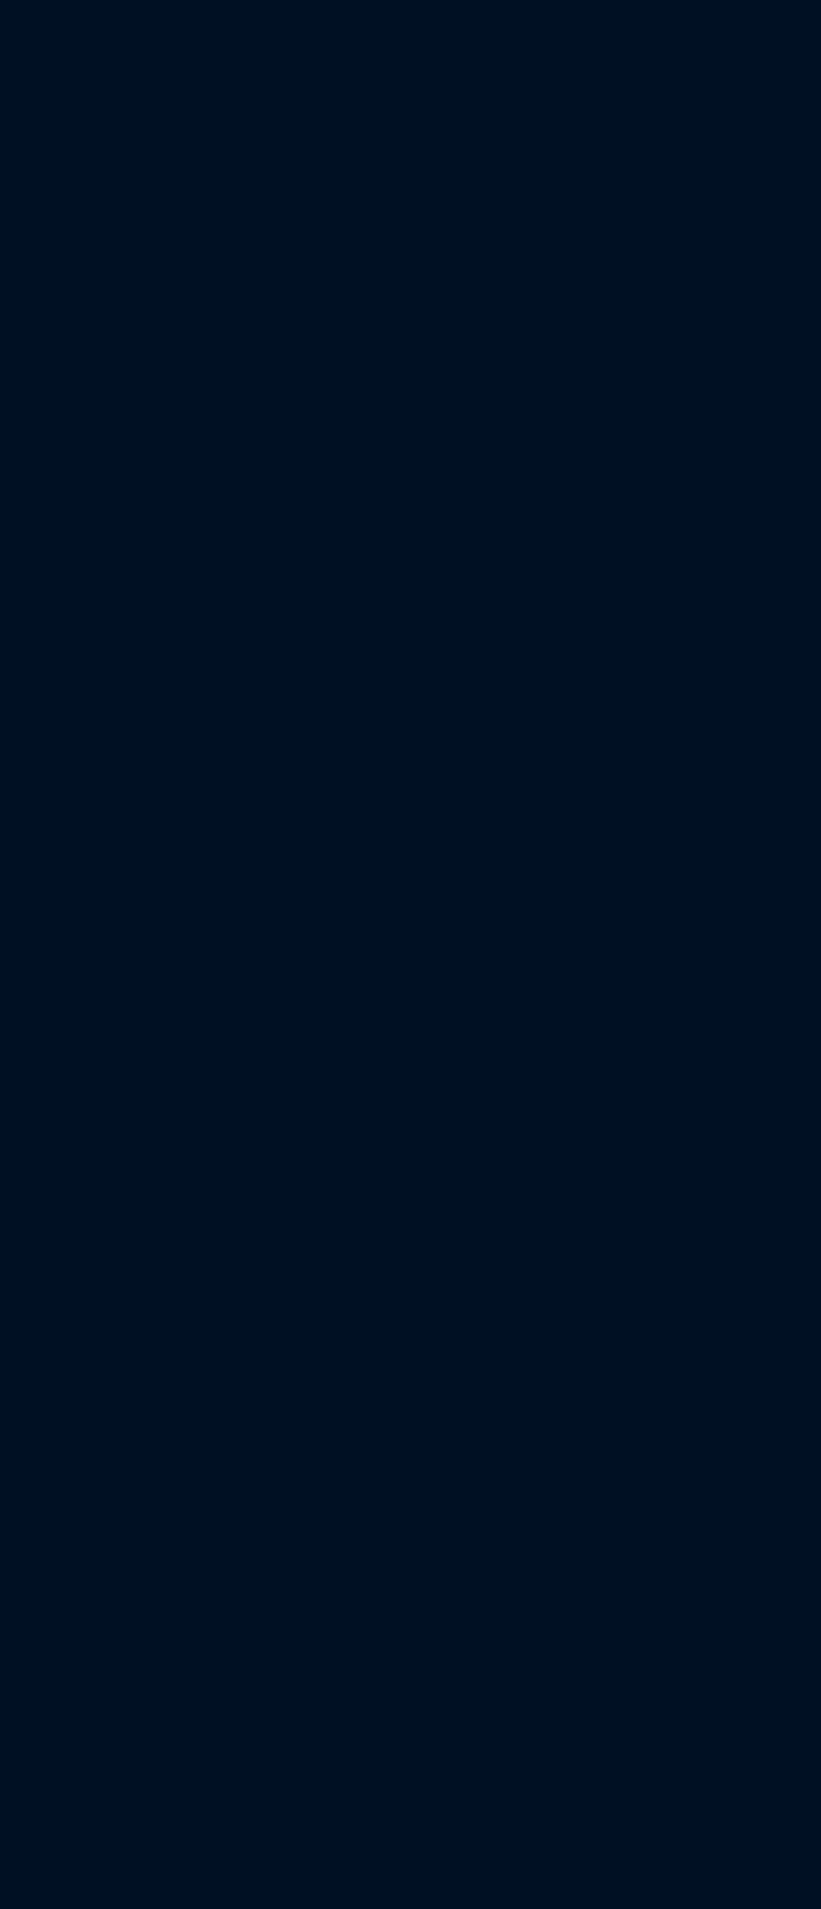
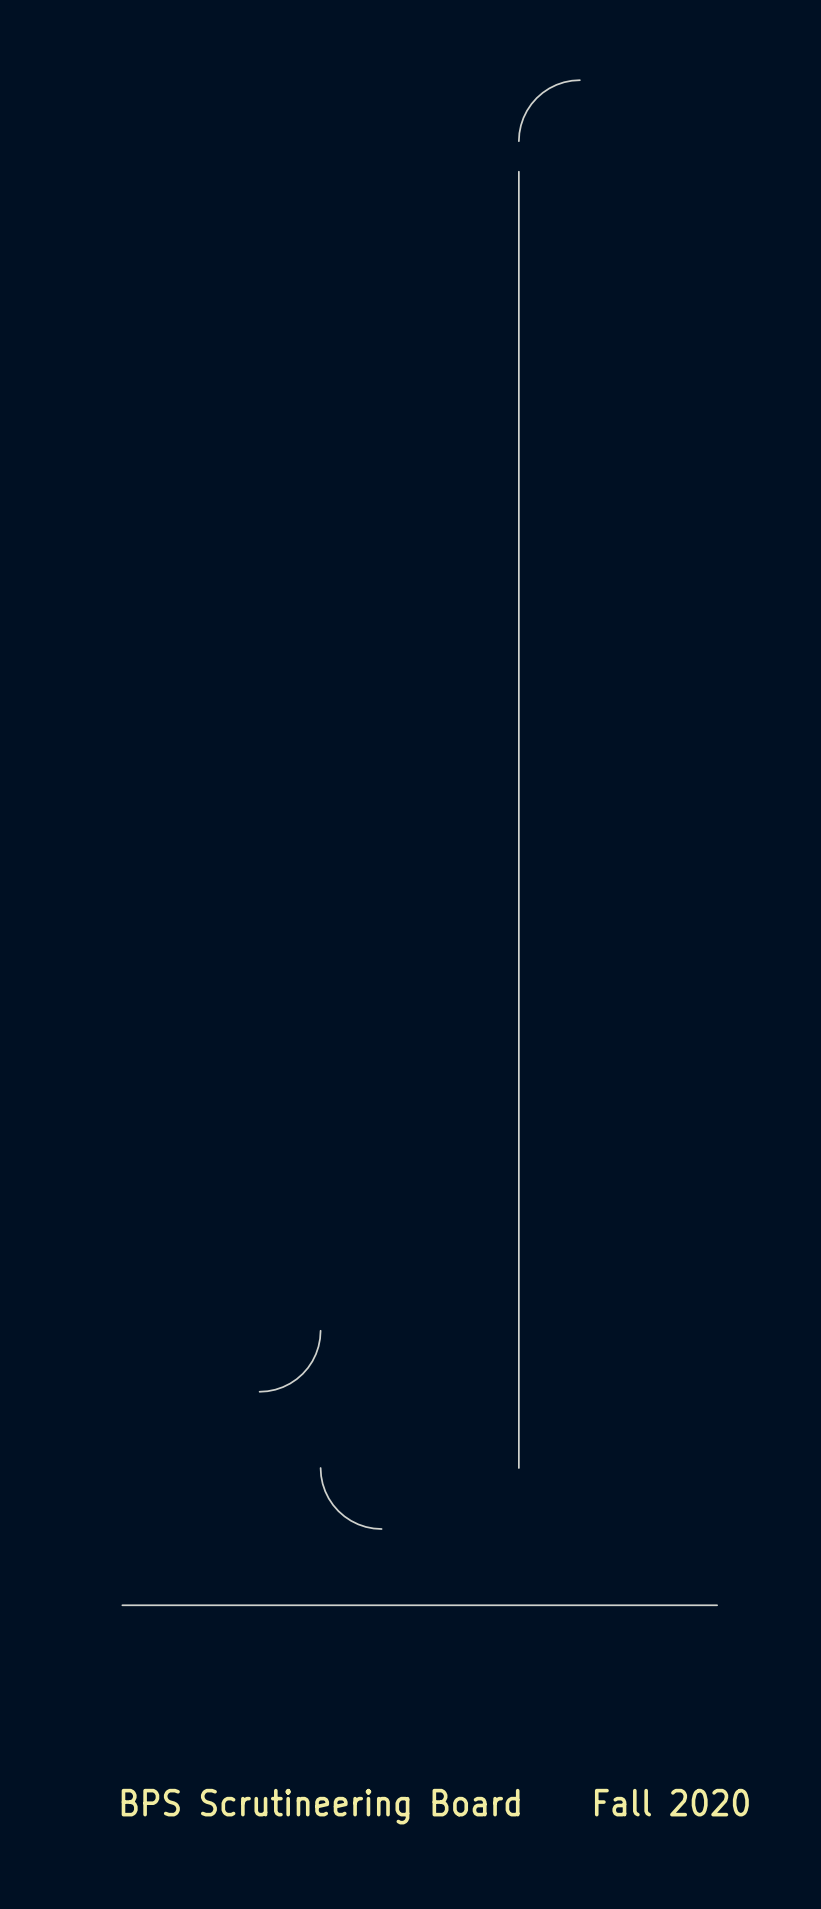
board edge: none -> (579, 80) (556, 84) (536, 98) (523, 117) (518, 141)
board edge: none -> (518, 171) (518, 1468)
board edge: none -> (320, 1330) (315, 1354) (302, 1373) (282, 1387) (259, 1391)
board edge: none -> (320, 1468) (325, 1491) (338, 1511) (358, 1524) (381, 1529)
board edge: none -> (122, 1605) (717, 1605)
text: none -> Fall 2020 (671, 1802)
text: none -> BPS Scrutineering Board (320, 1806)

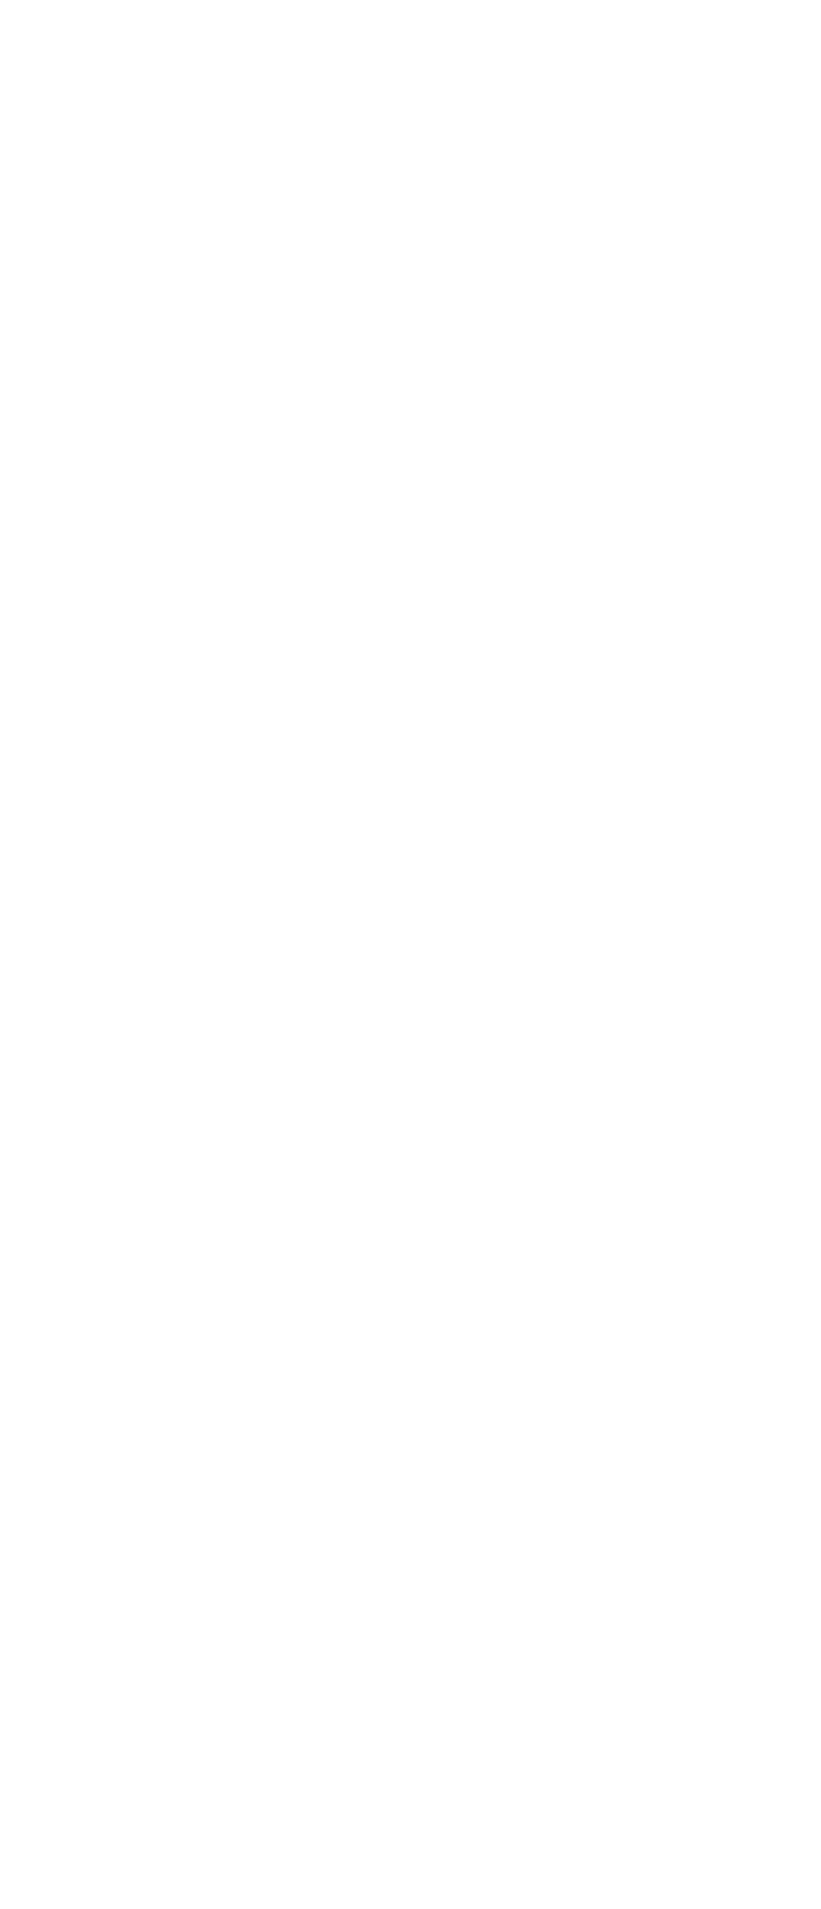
board edge: (579, 80) (556, 84) (536, 98) (523, 117) (518, 141) -> none
board edge: (518, 171) (518, 1468) -> none
board edge: (320, 1330) (315, 1354) (302, 1373) (282, 1387) (259, 1391) -> none
board edge: (320, 1468) (325, 1491) (338, 1511) (358, 1524) (381, 1529) -> none
board edge: (122, 1605) (717, 1605) -> none
text: Fall 2020 (671, 1802) -> none
text: BPS Scrutineering Board (320, 1806) -> none

